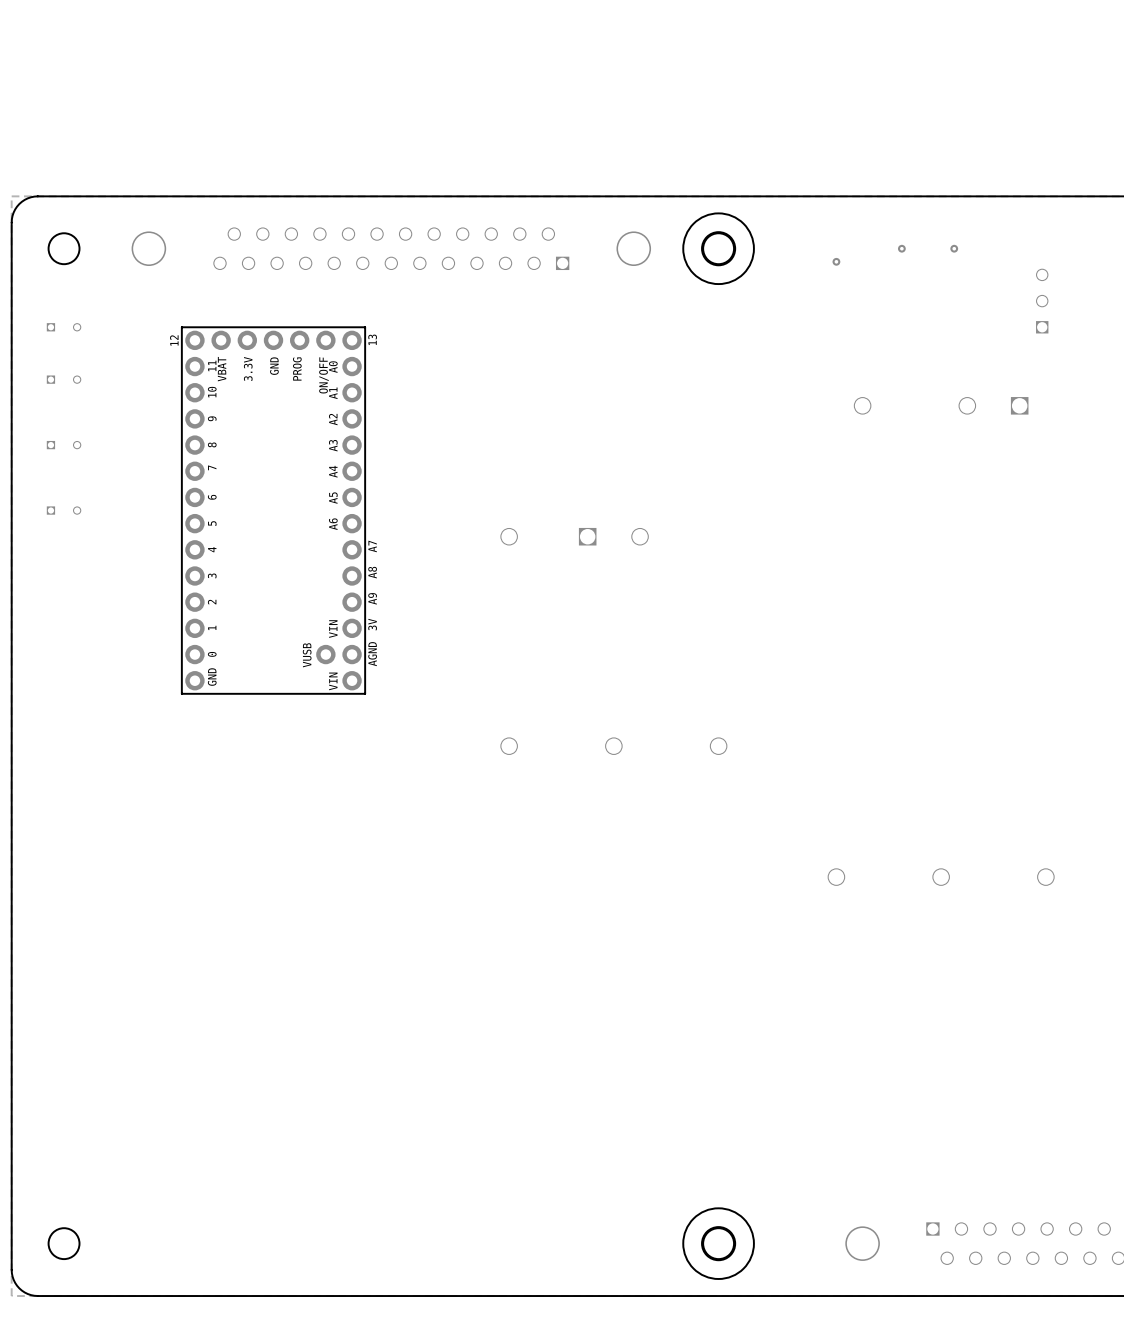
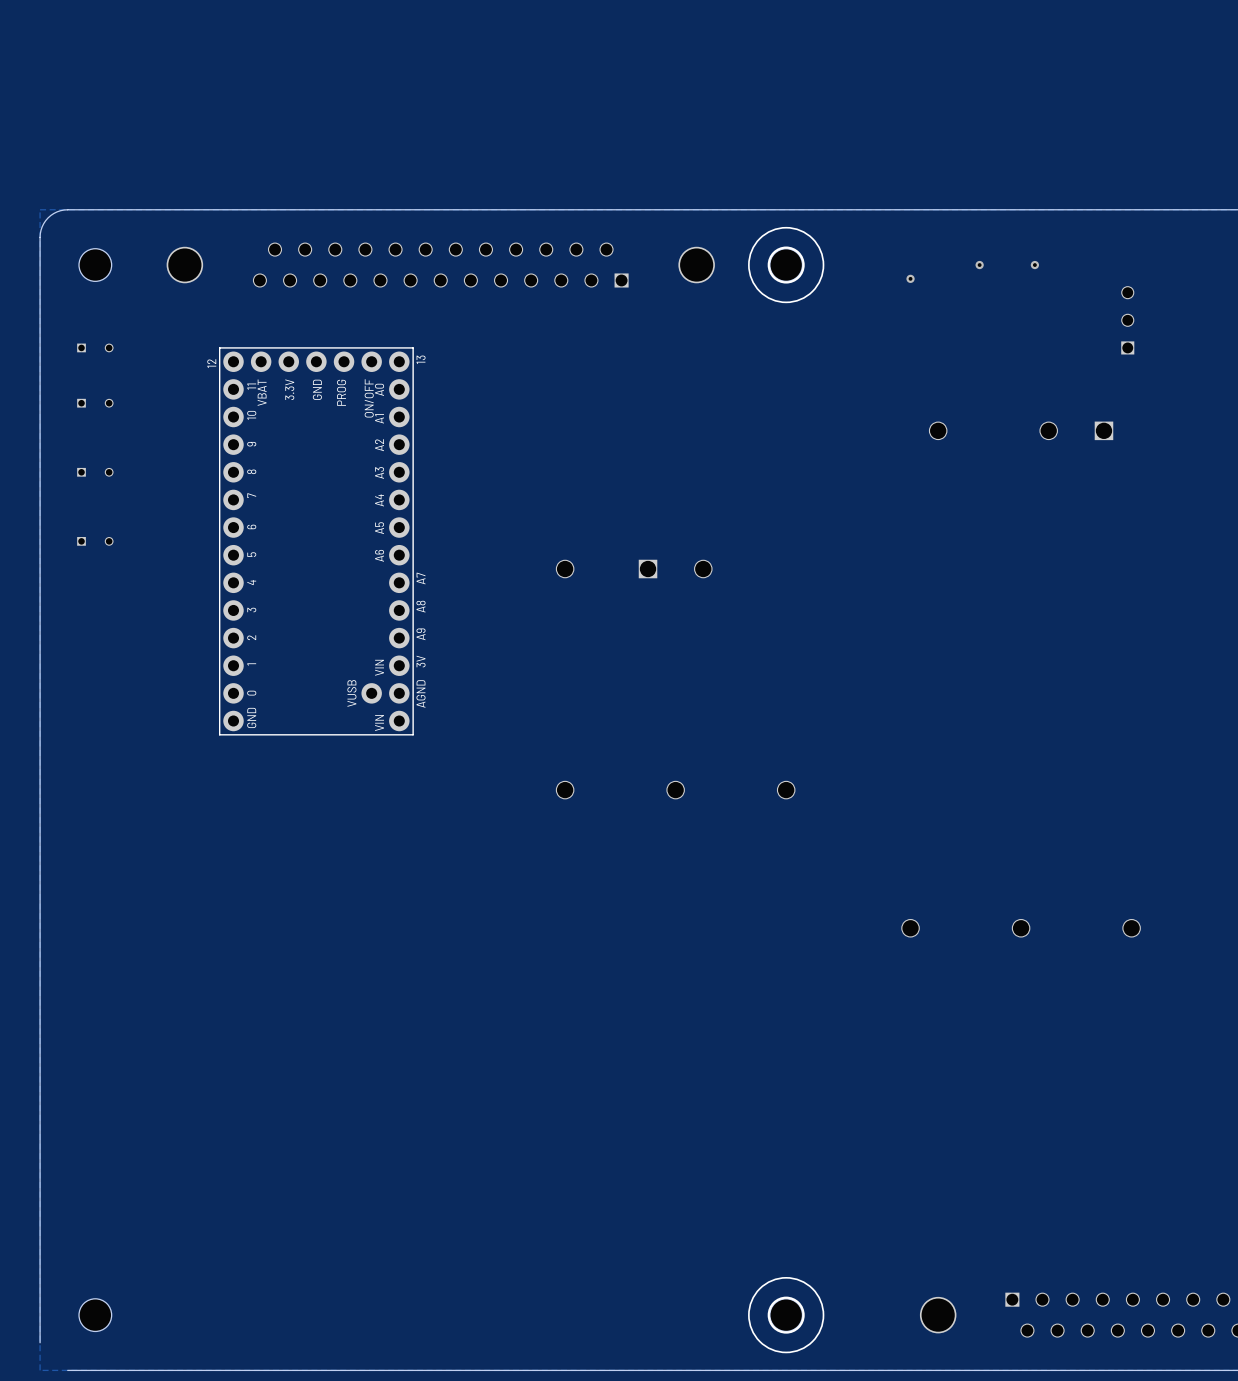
board edge: (11, 1269) (13, 1279) (19, 1288) (27, 1294) (37, 1296) -> none

